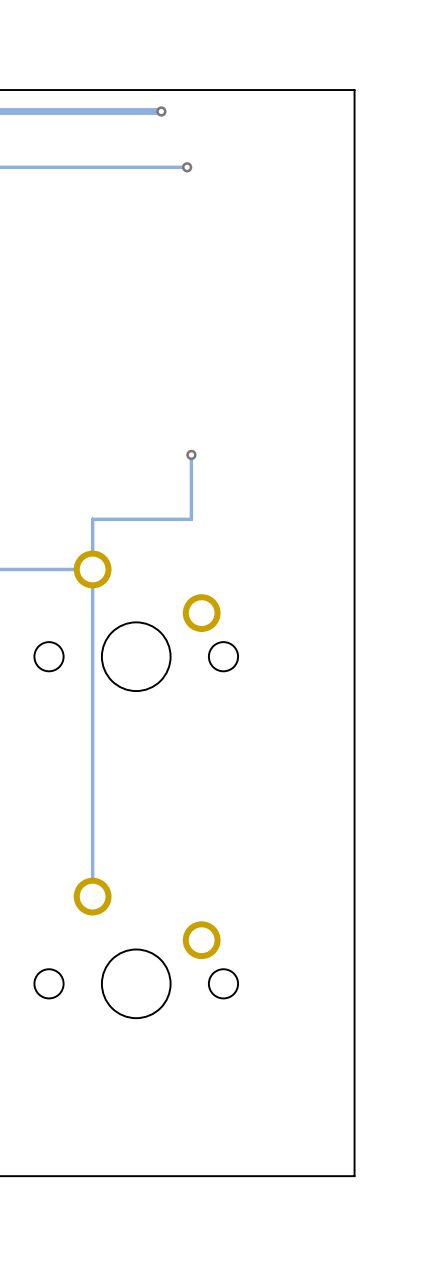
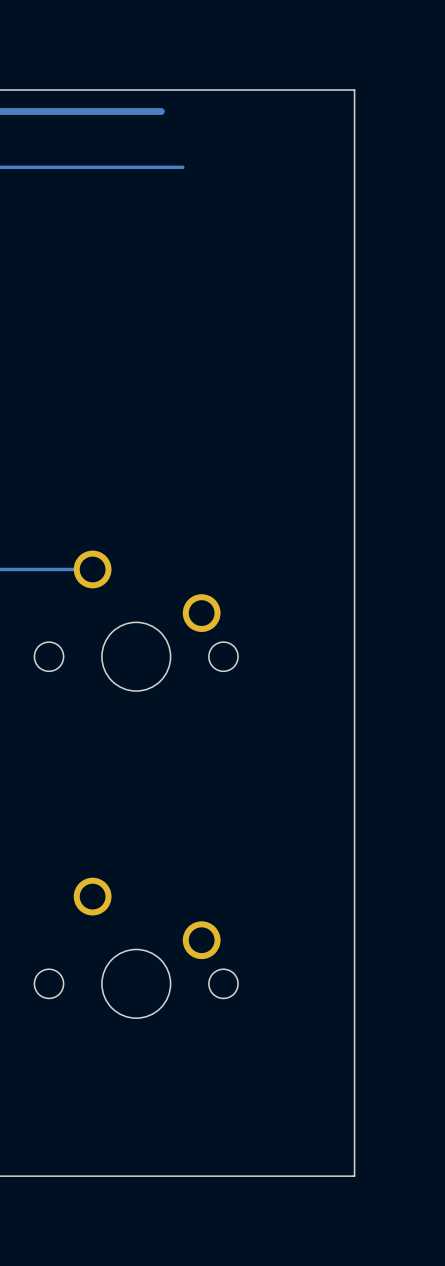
via: (161, 111) -> none
via: (187, 167) -> none
track: (191, 454) (191, 519) (92, 519) (92, 896) -> none
via: (191, 454) -> none

